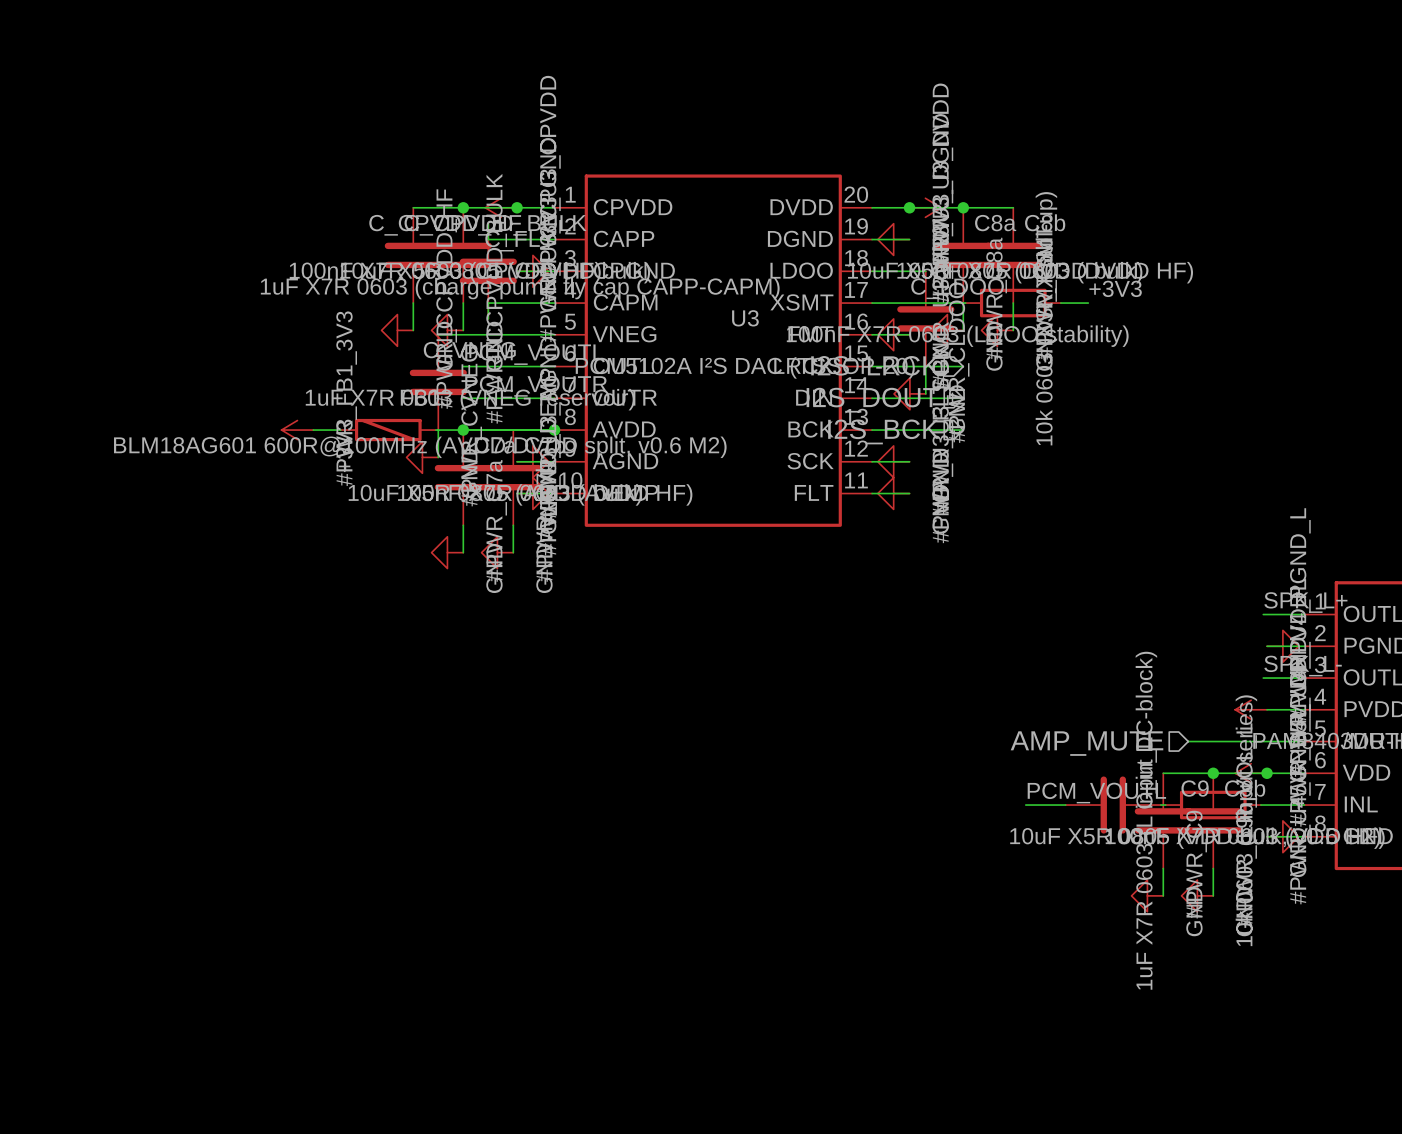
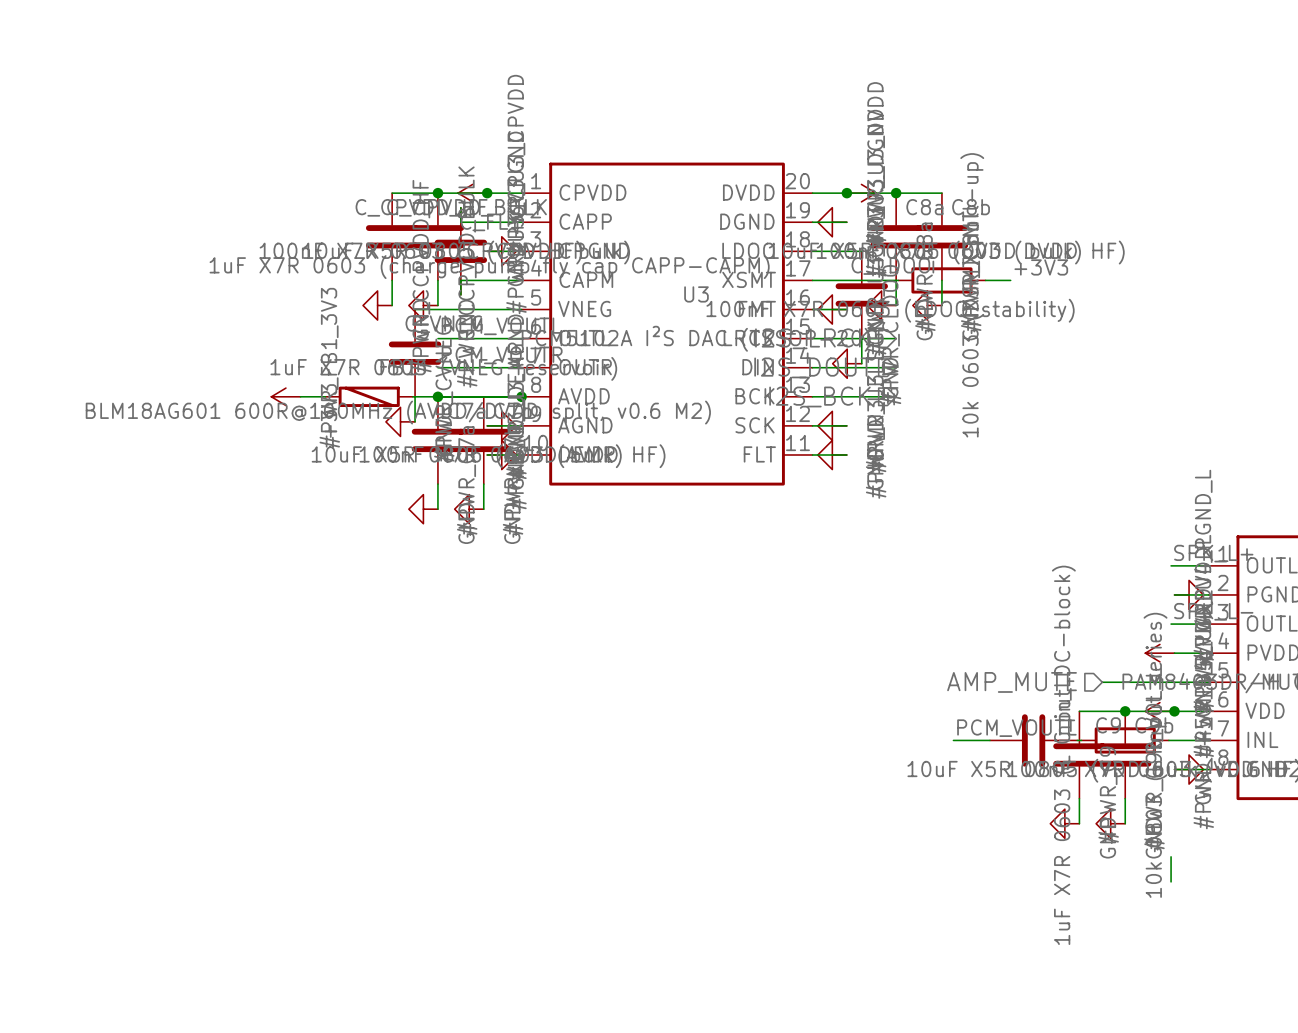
wire: none -> (1171, 856) (1171, 881)

